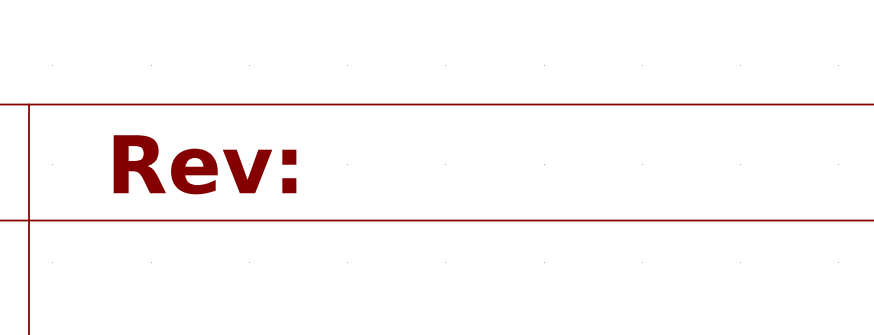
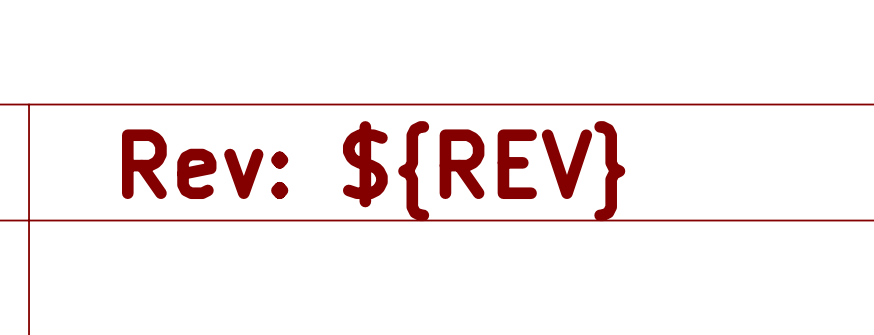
title block: Rev: (205, 164) -> Rev: ${REV} (373, 171)

